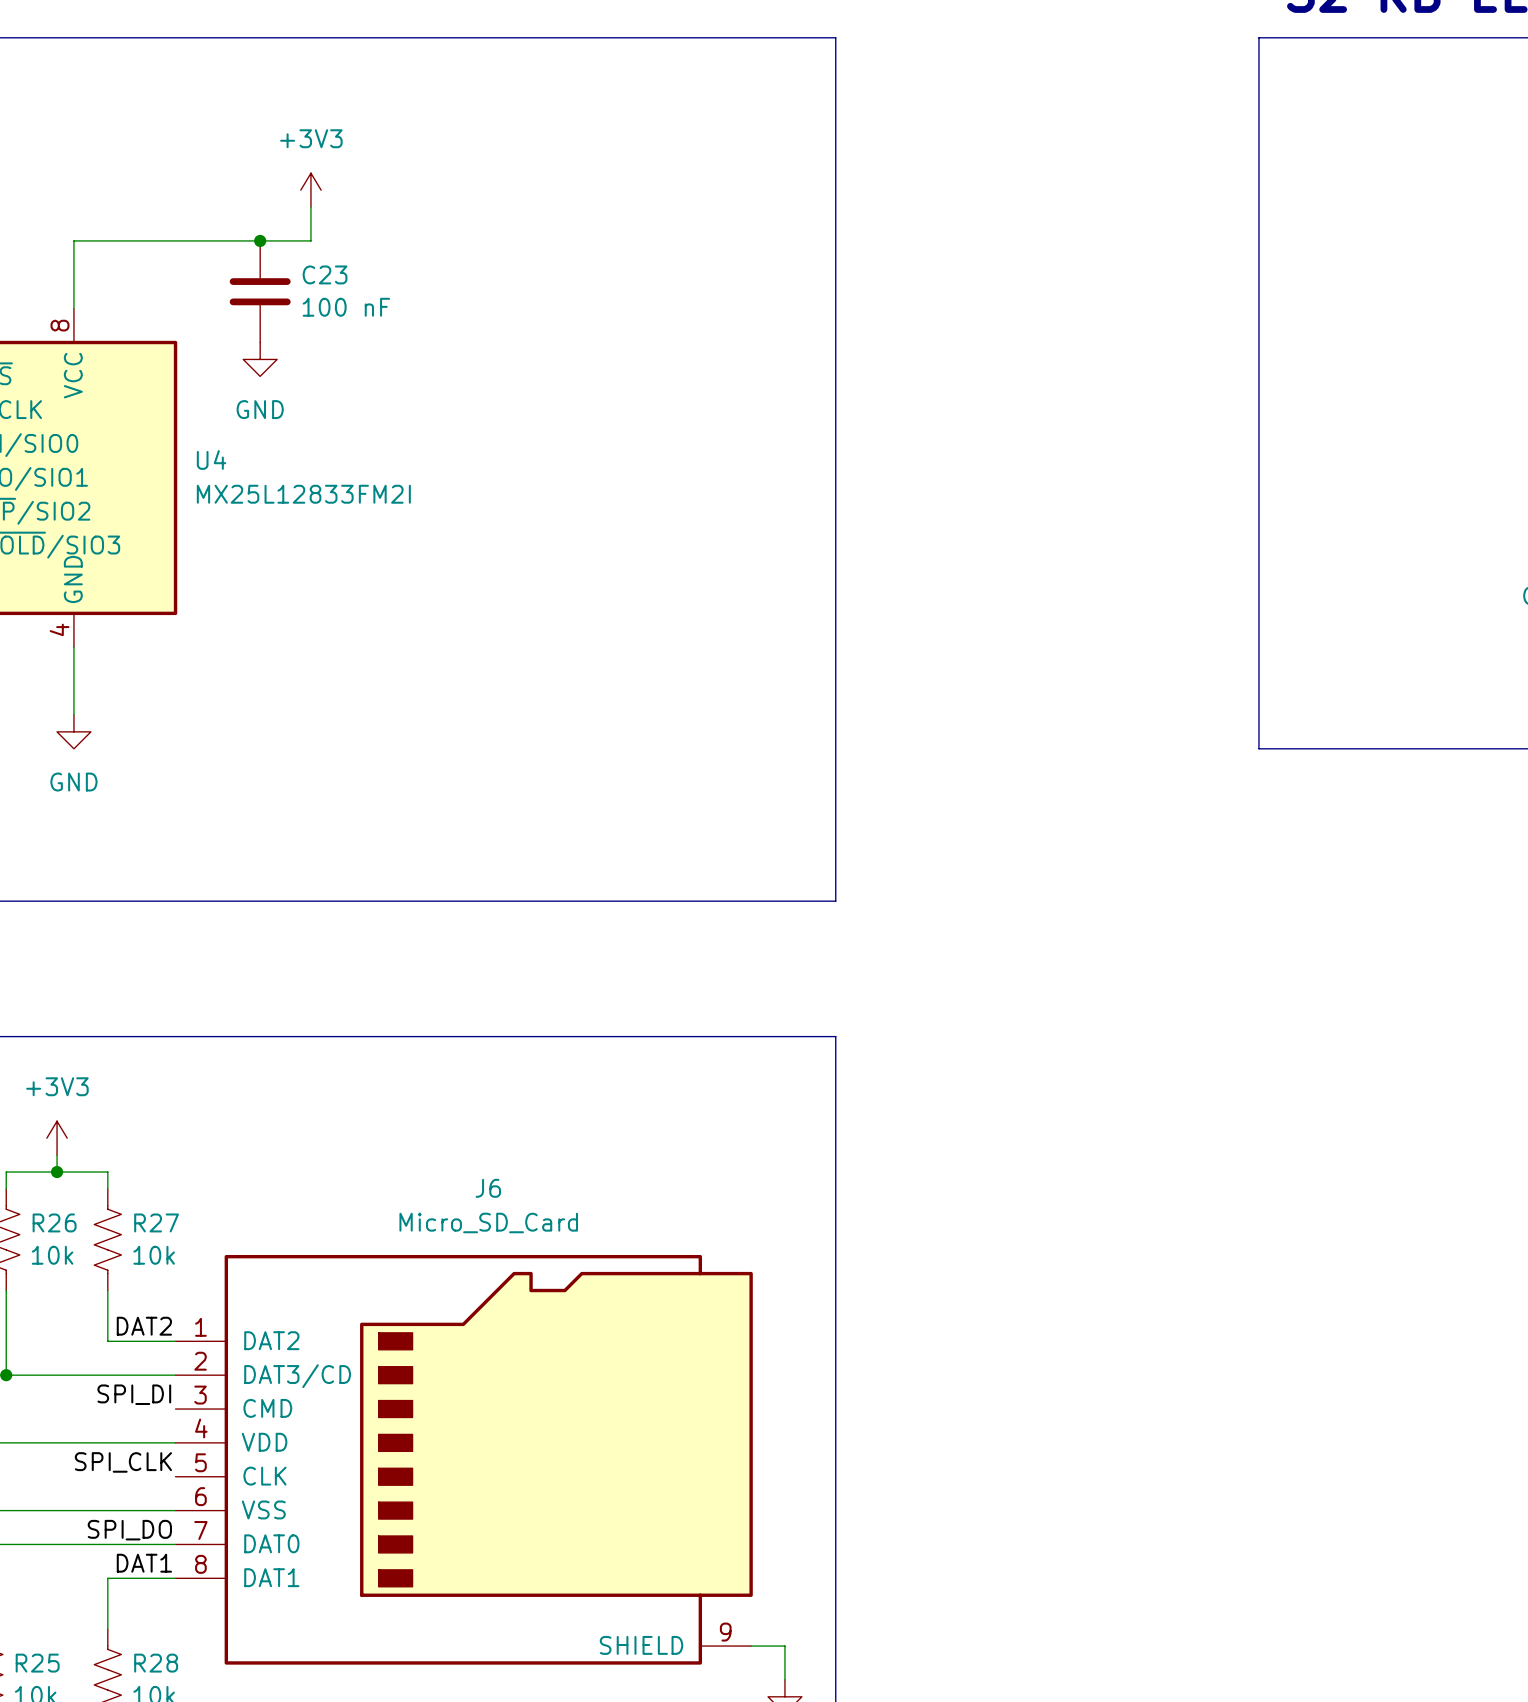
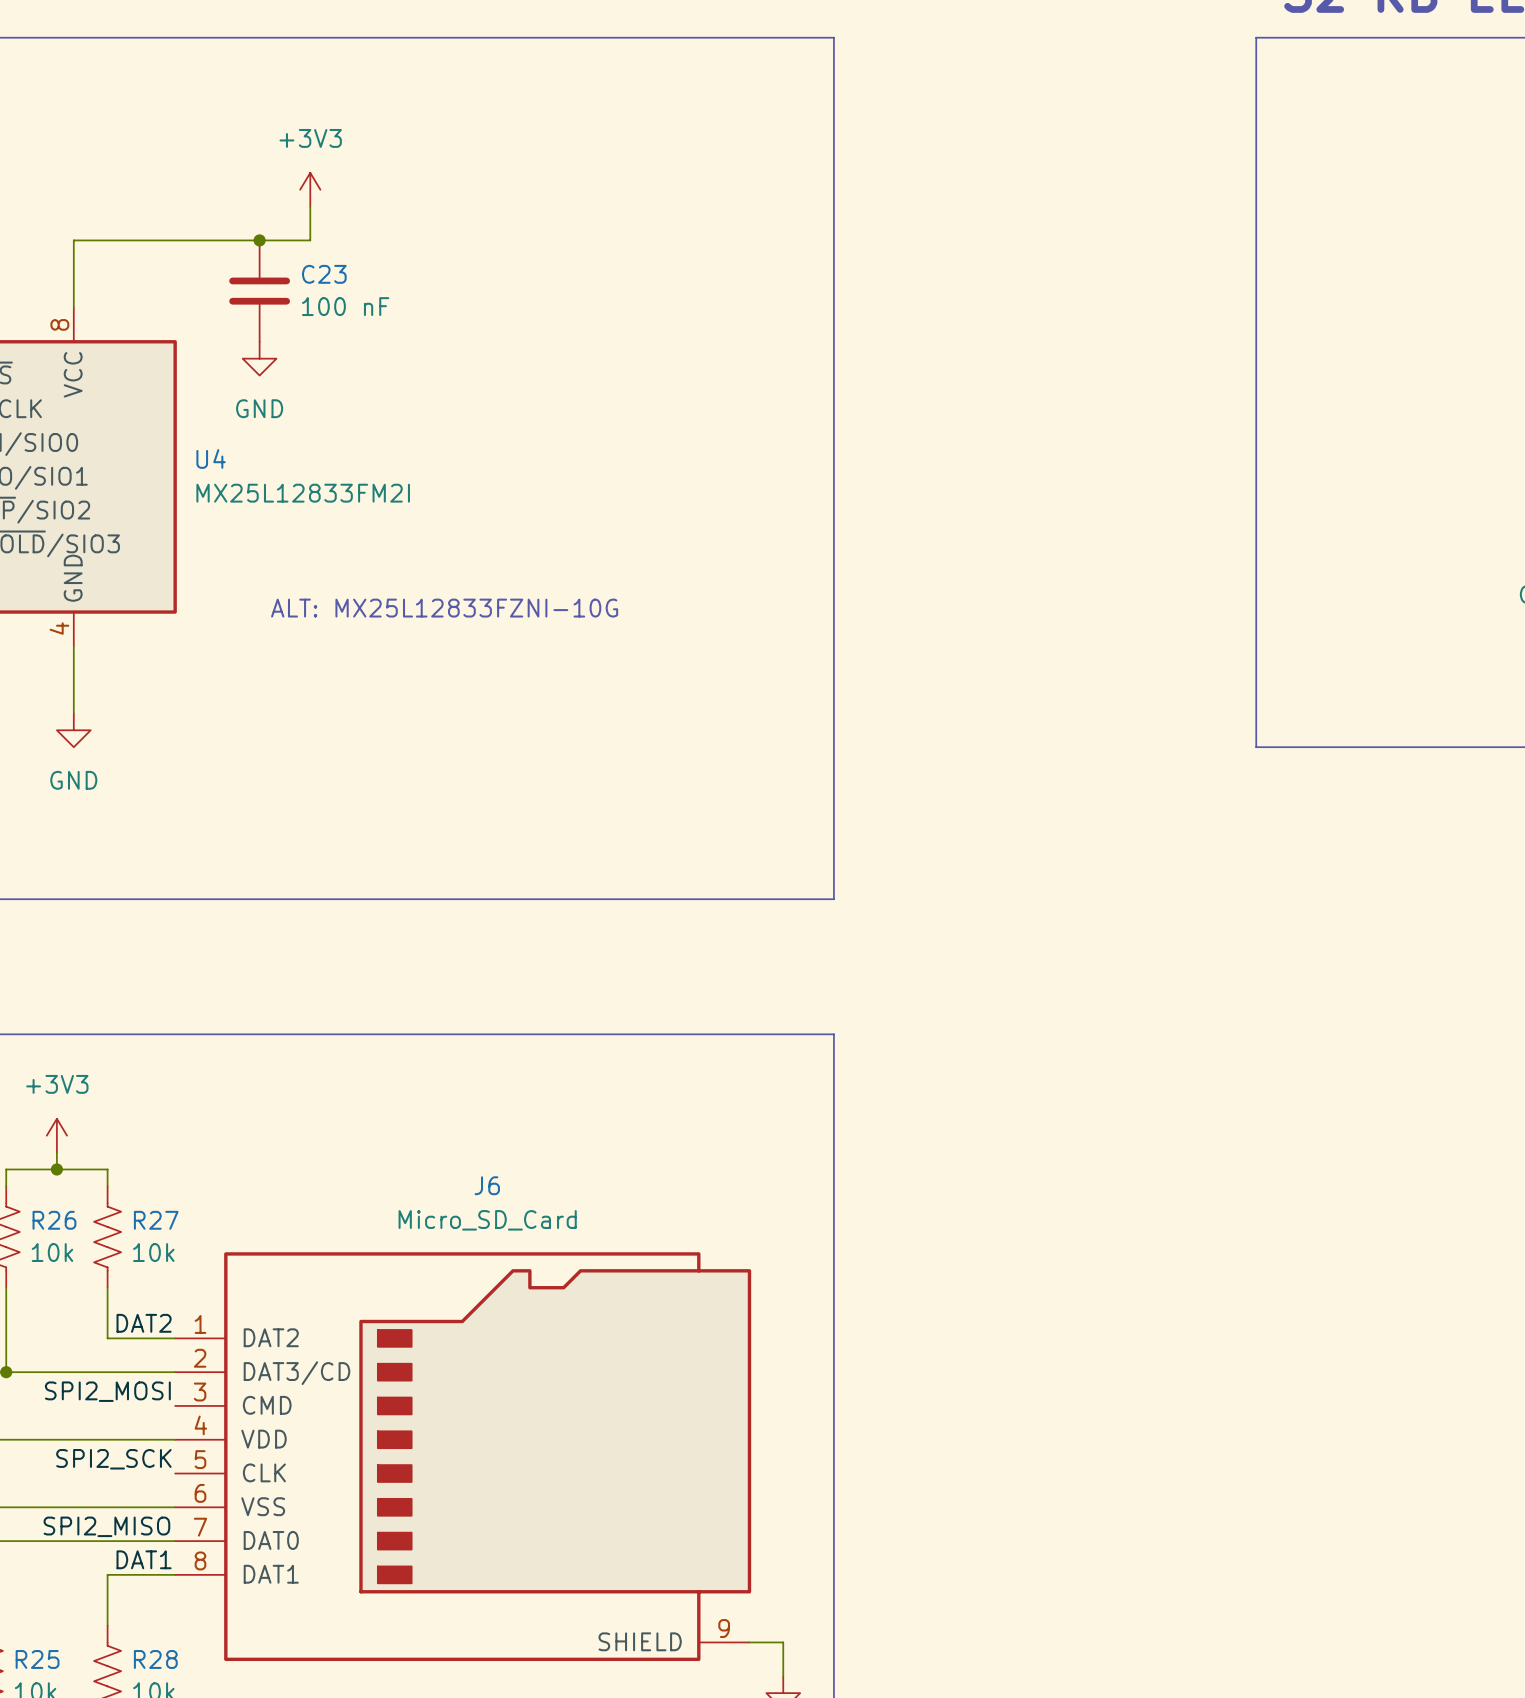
text: none -> ALT: MX25L12833FZNI-10G (444, 608)
label: SPI_DI (134, 1394) -> SPI2_MOSI (107, 1391)
label: SPI_CLK (123, 1462) -> SPI2_SCK (113, 1459)
label: SPI_DO (129, 1530) -> SPI2_MISO (106, 1526)

